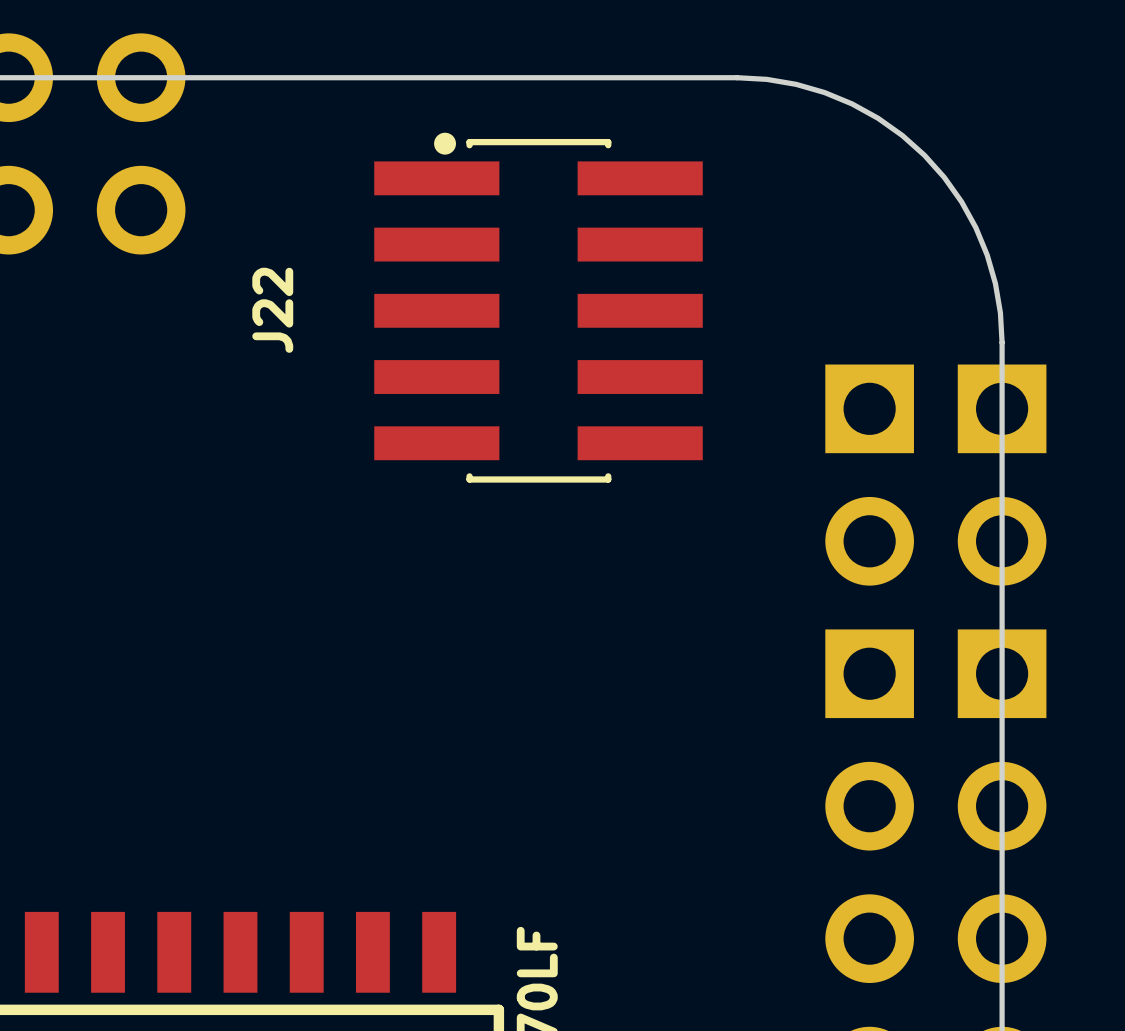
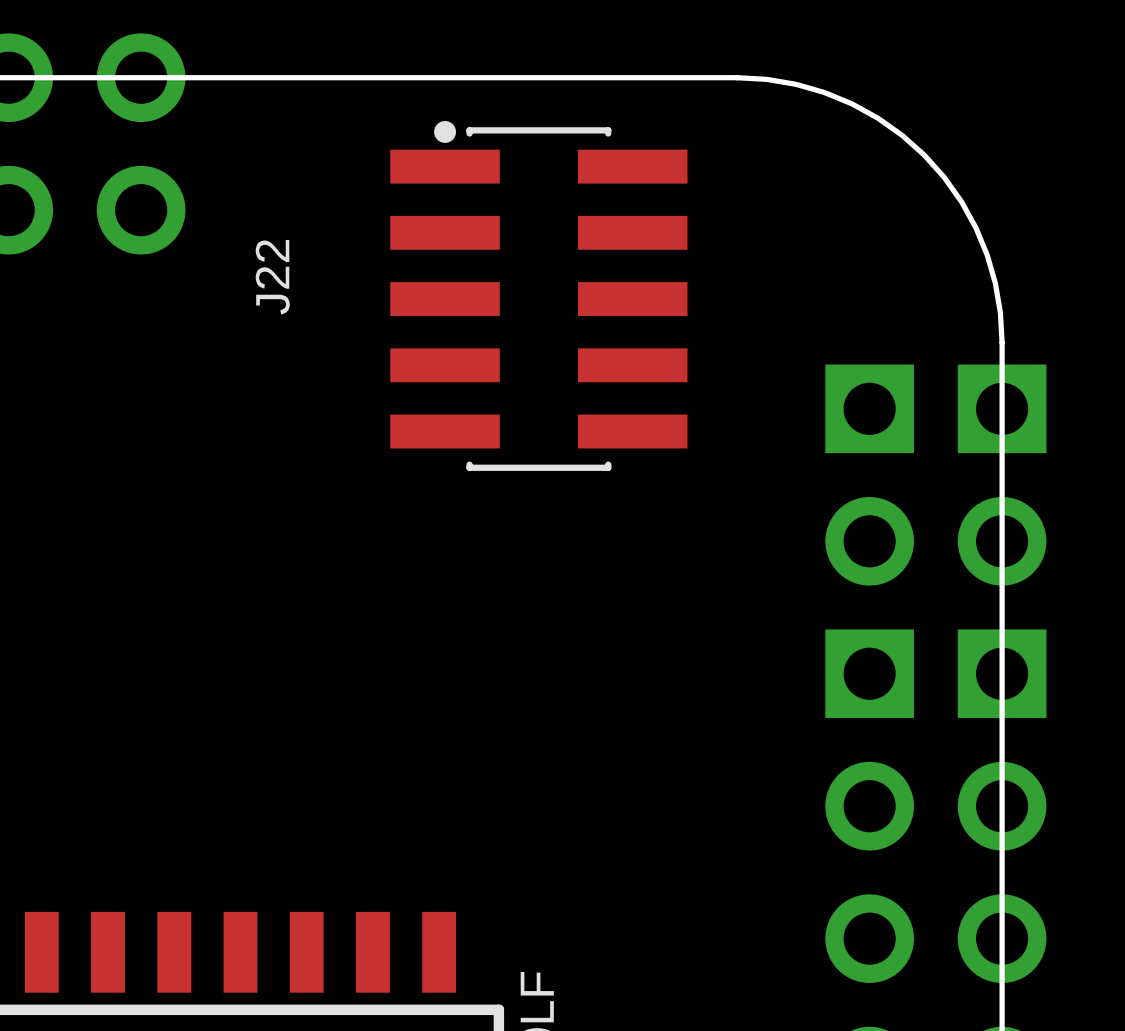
J22 footprint: [374, 132, 703, 483] -> [390, 120, 688, 471]
J22 name position: J22 (272, 310) -> J22 (272, 277)

